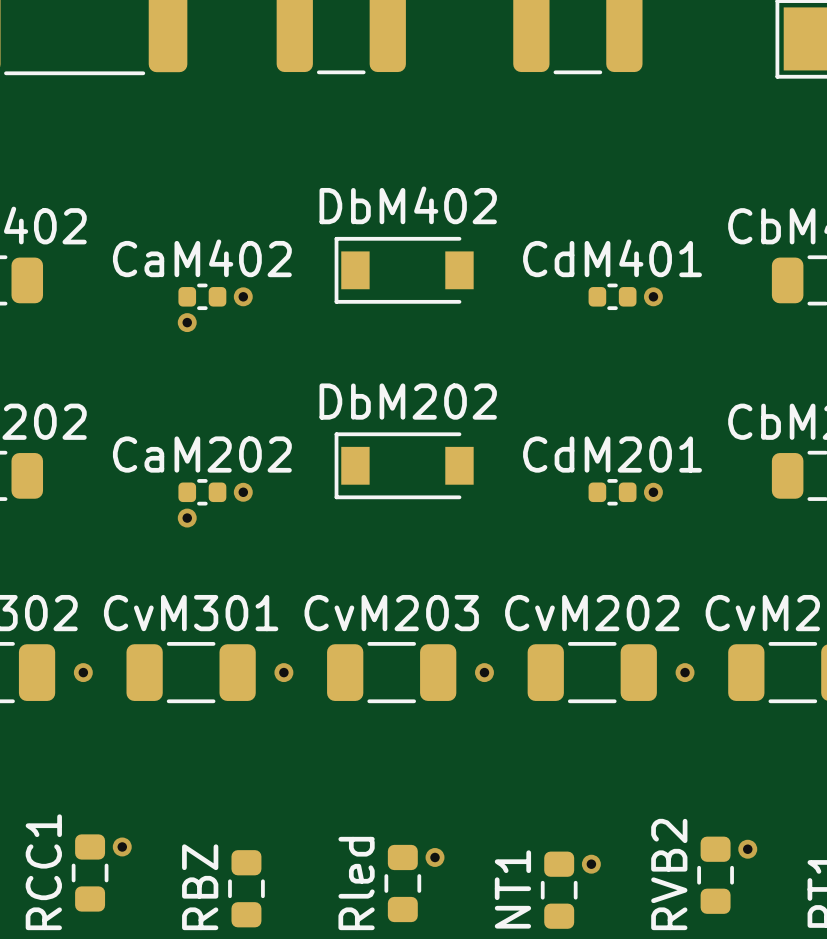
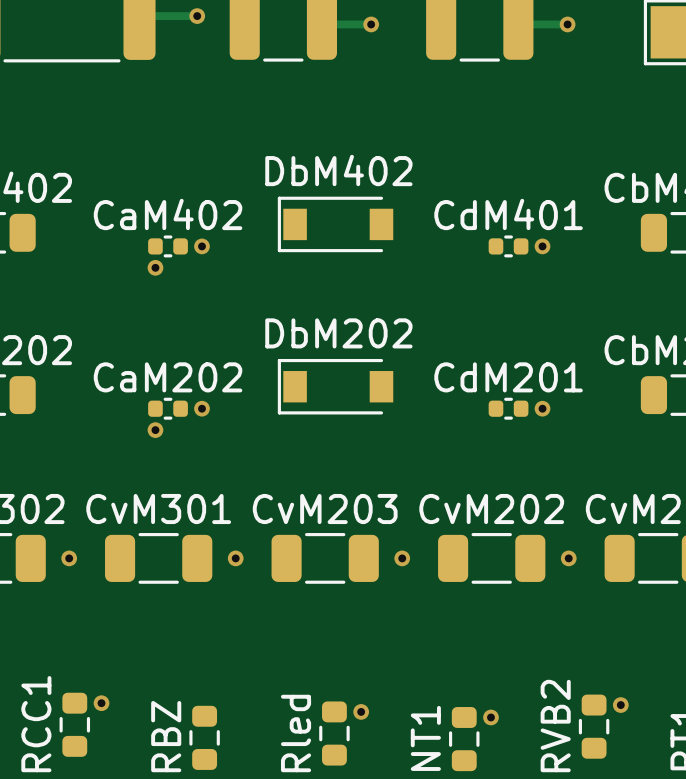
track: none -> (139, 16) (197, 16)
via: none -> (197, 16)
track: none -> (321, 24) (371, 24)
via: none -> (371, 24)
track: none -> (518, 24) (567, 24)
via: none -> (567, 24)

